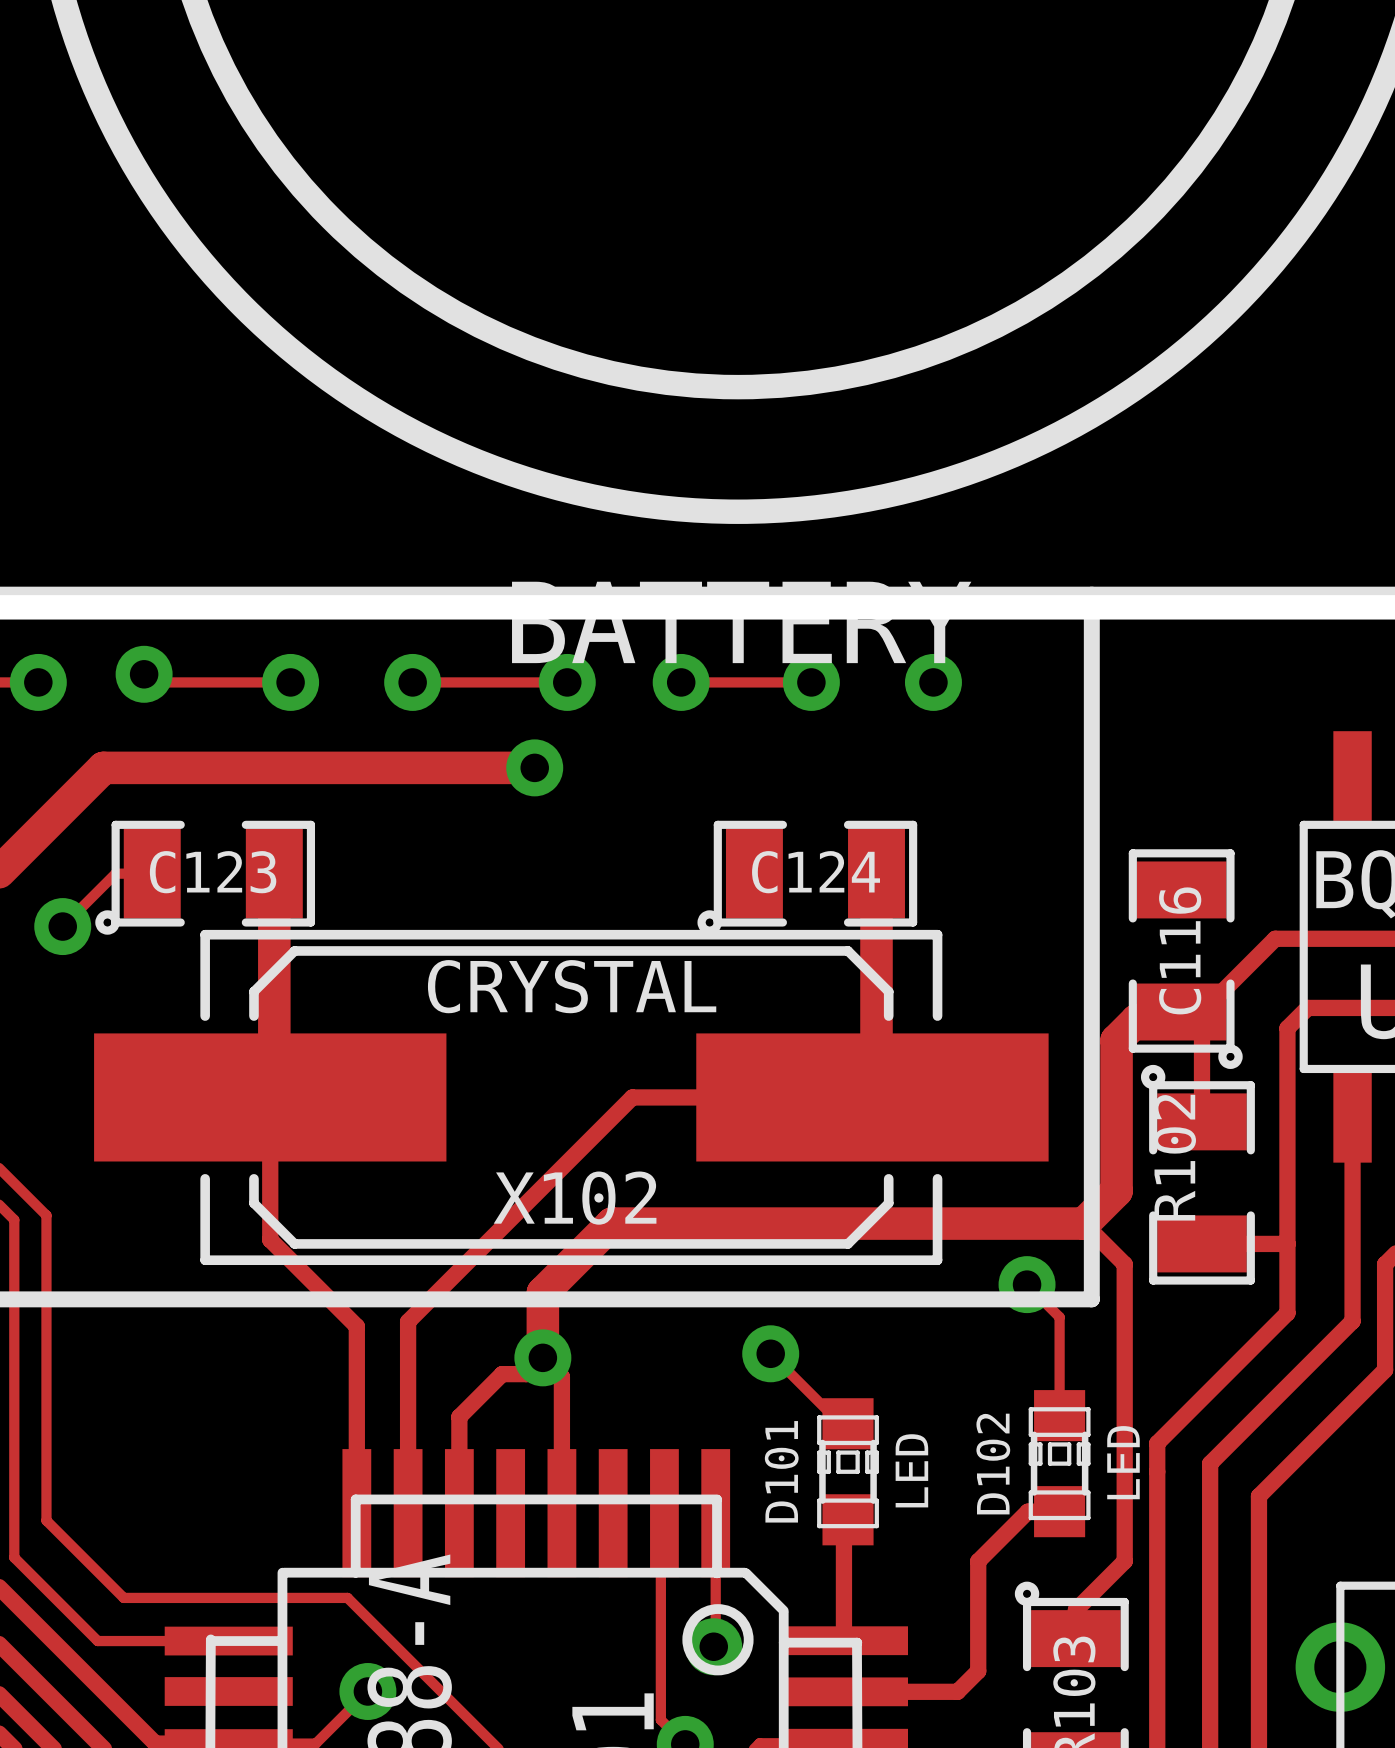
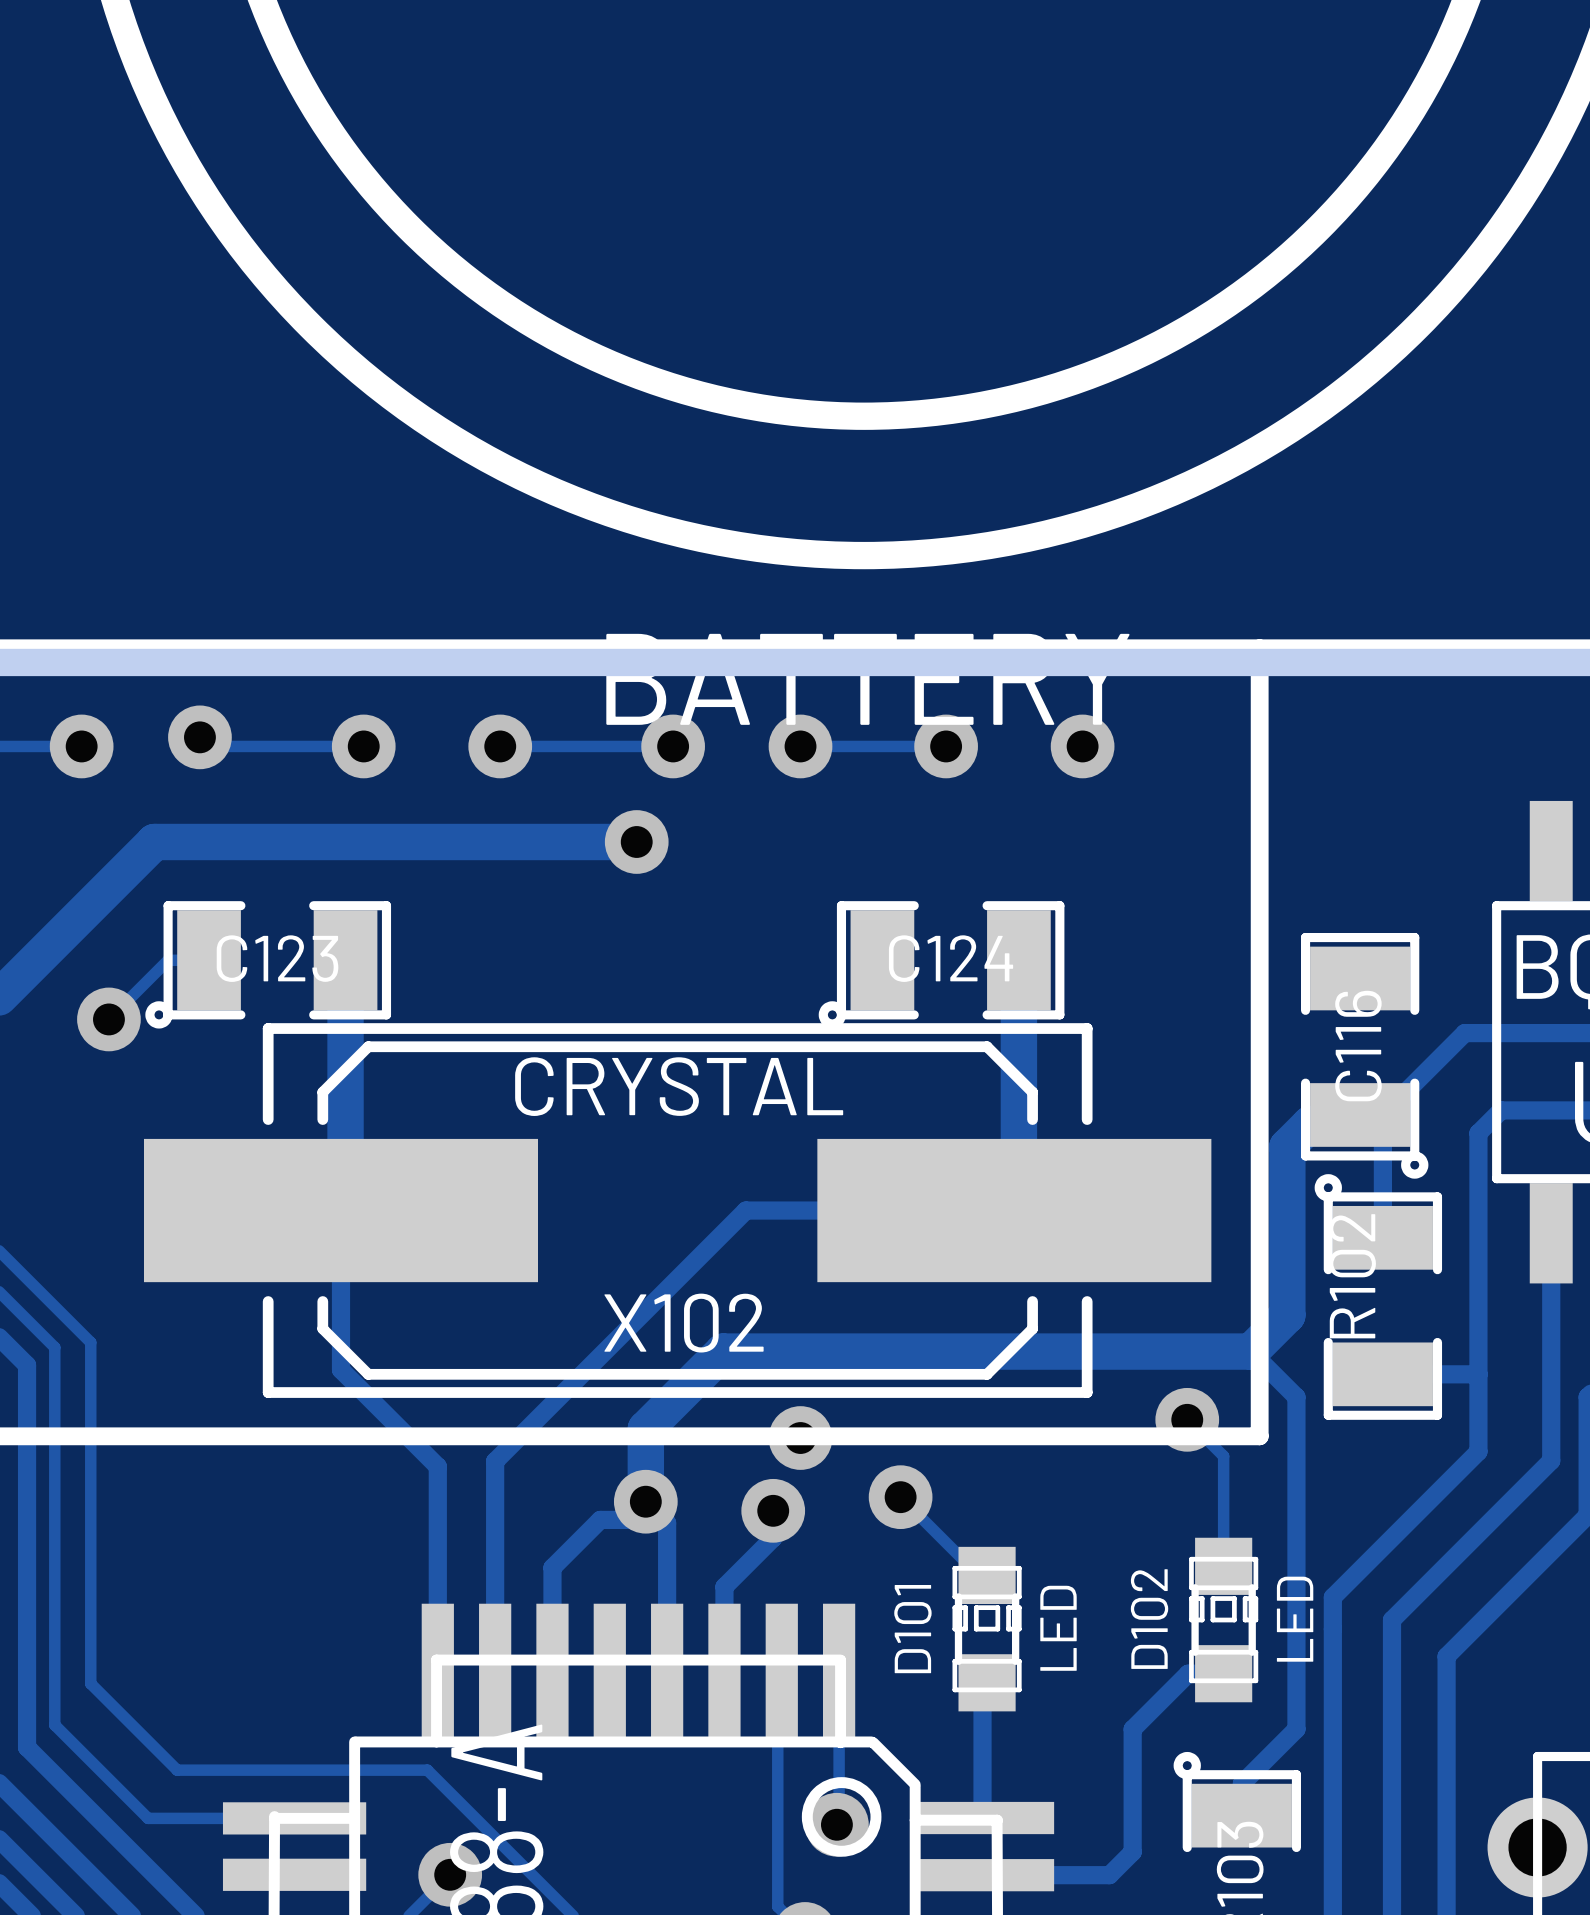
via: none -> (800, 1438)
track: none -> (773, 1510) (773, 1538) (724, 1586) (724, 1675)
via: none -> (773, 1510)

